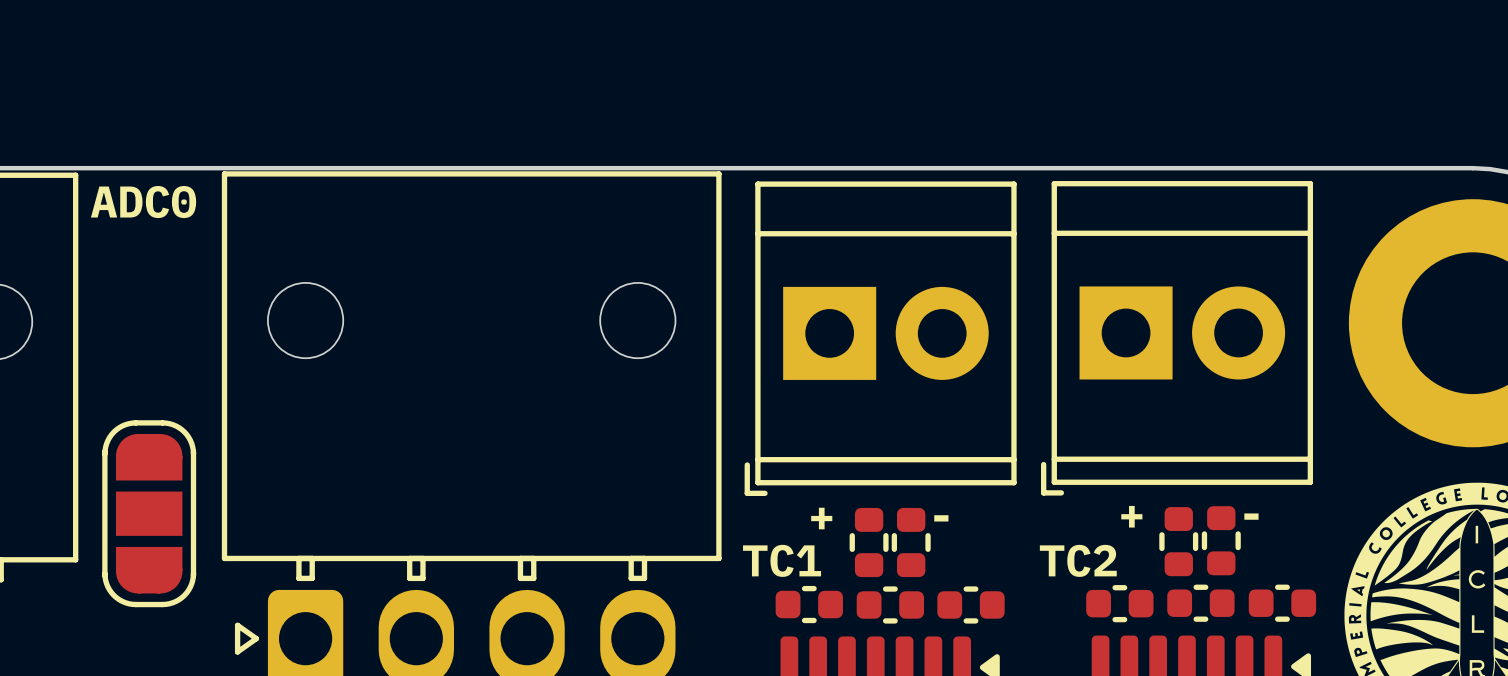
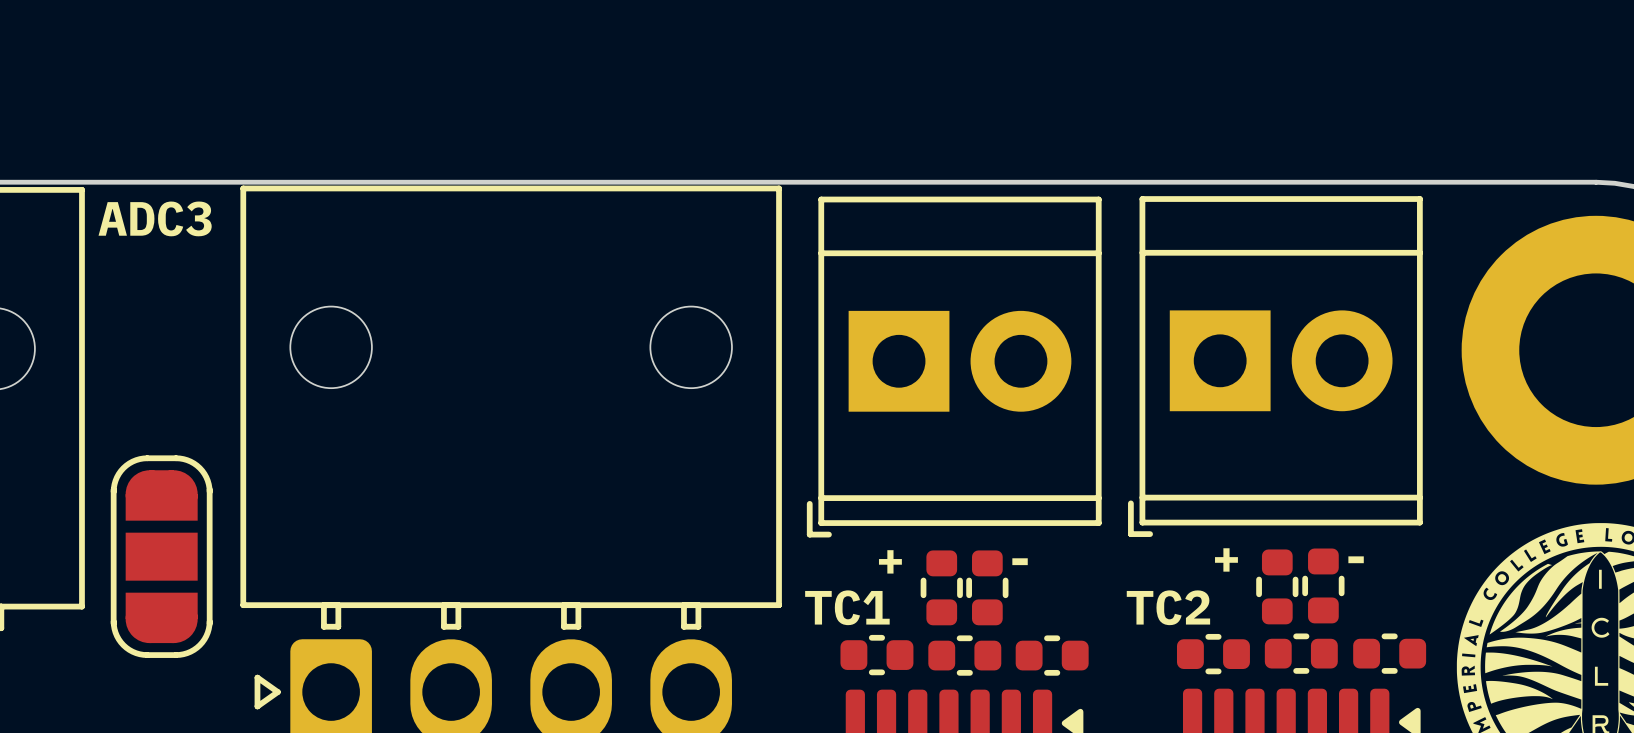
text: ADC0 (143, 202) -> ADC3 (155, 218)

